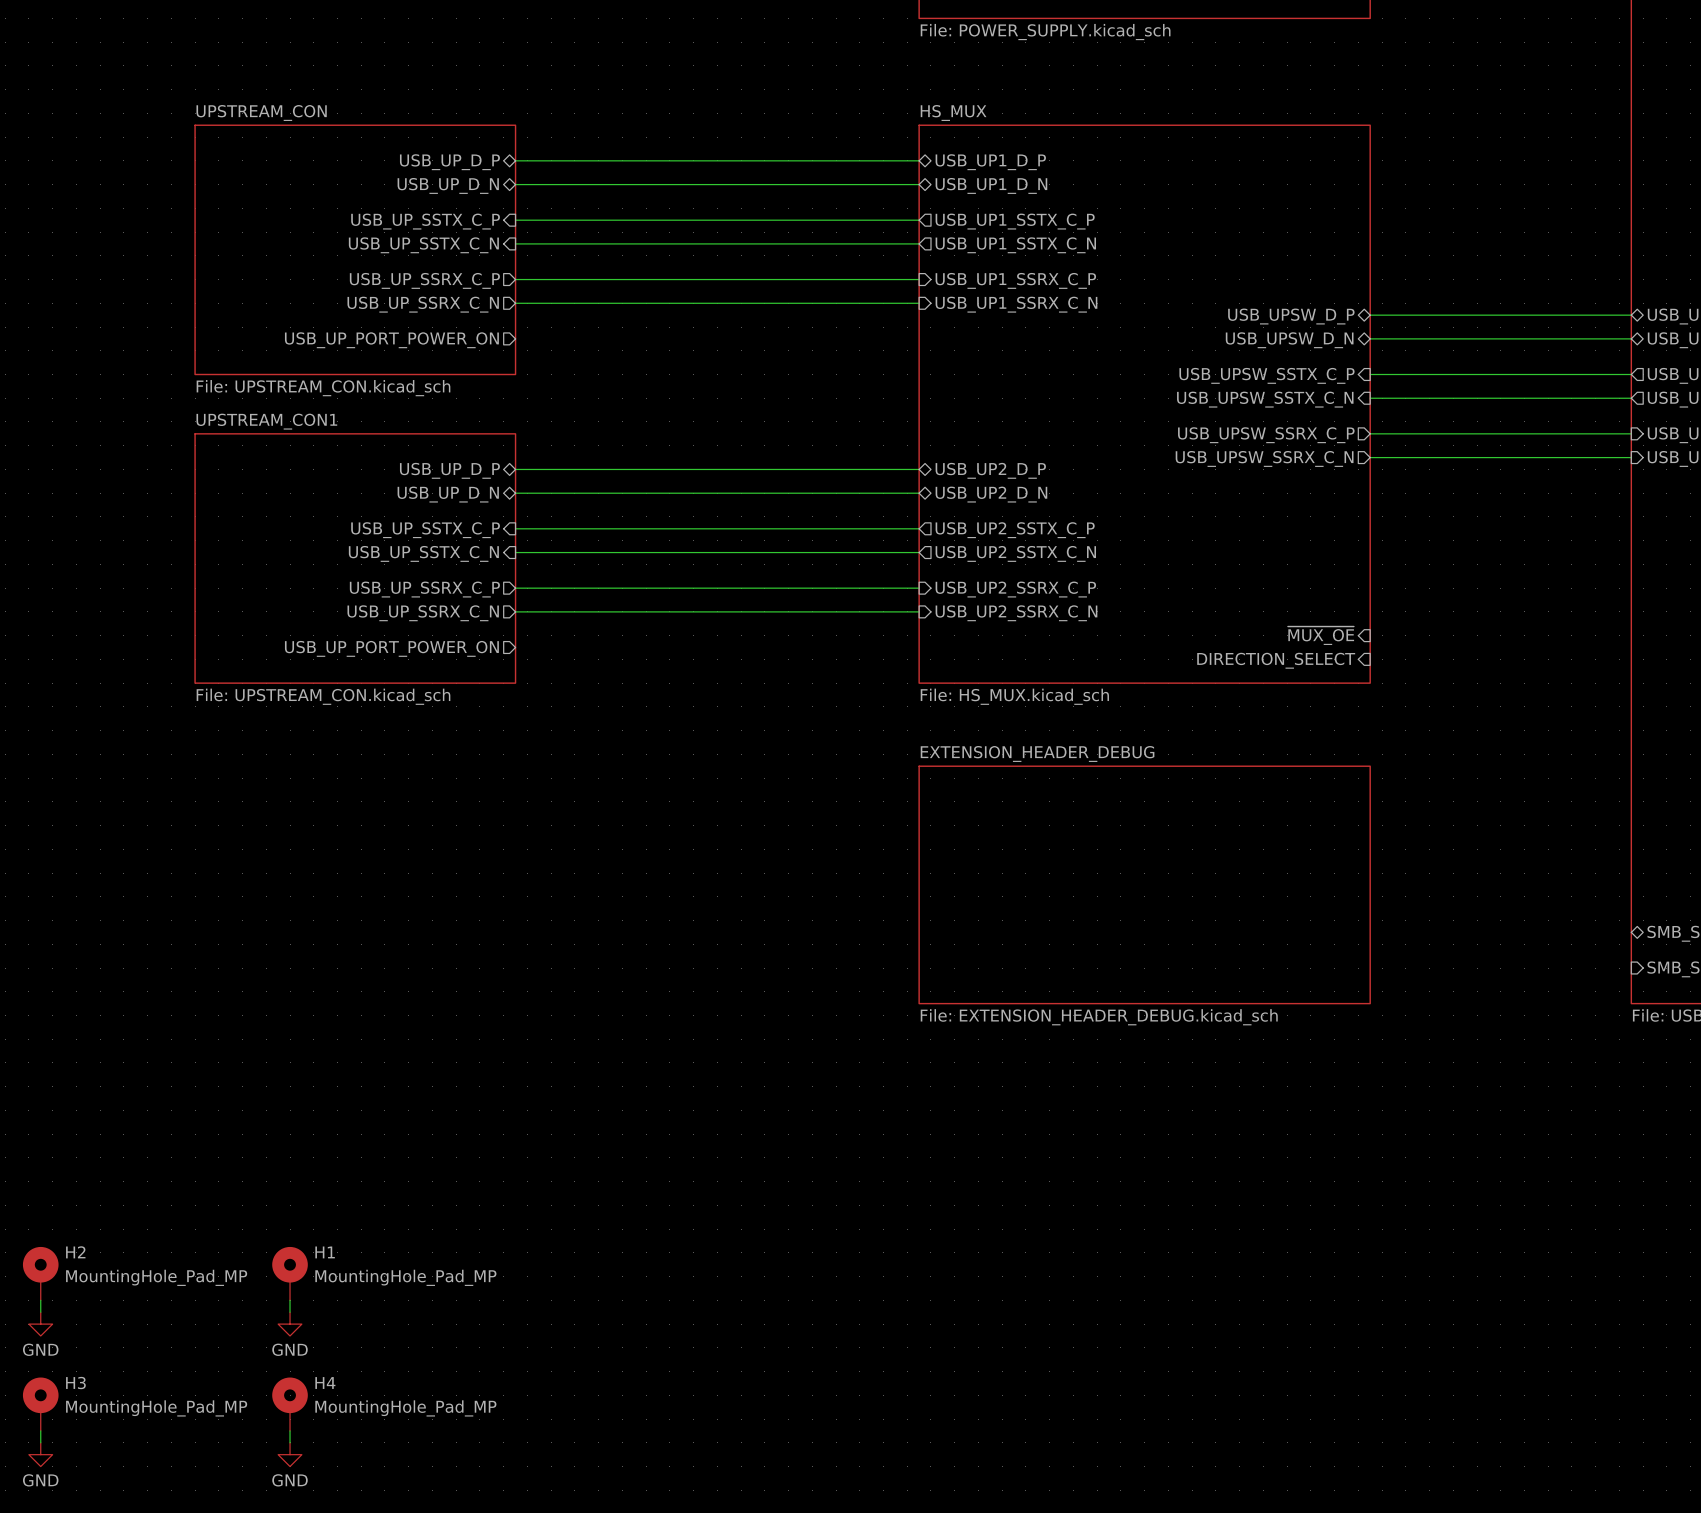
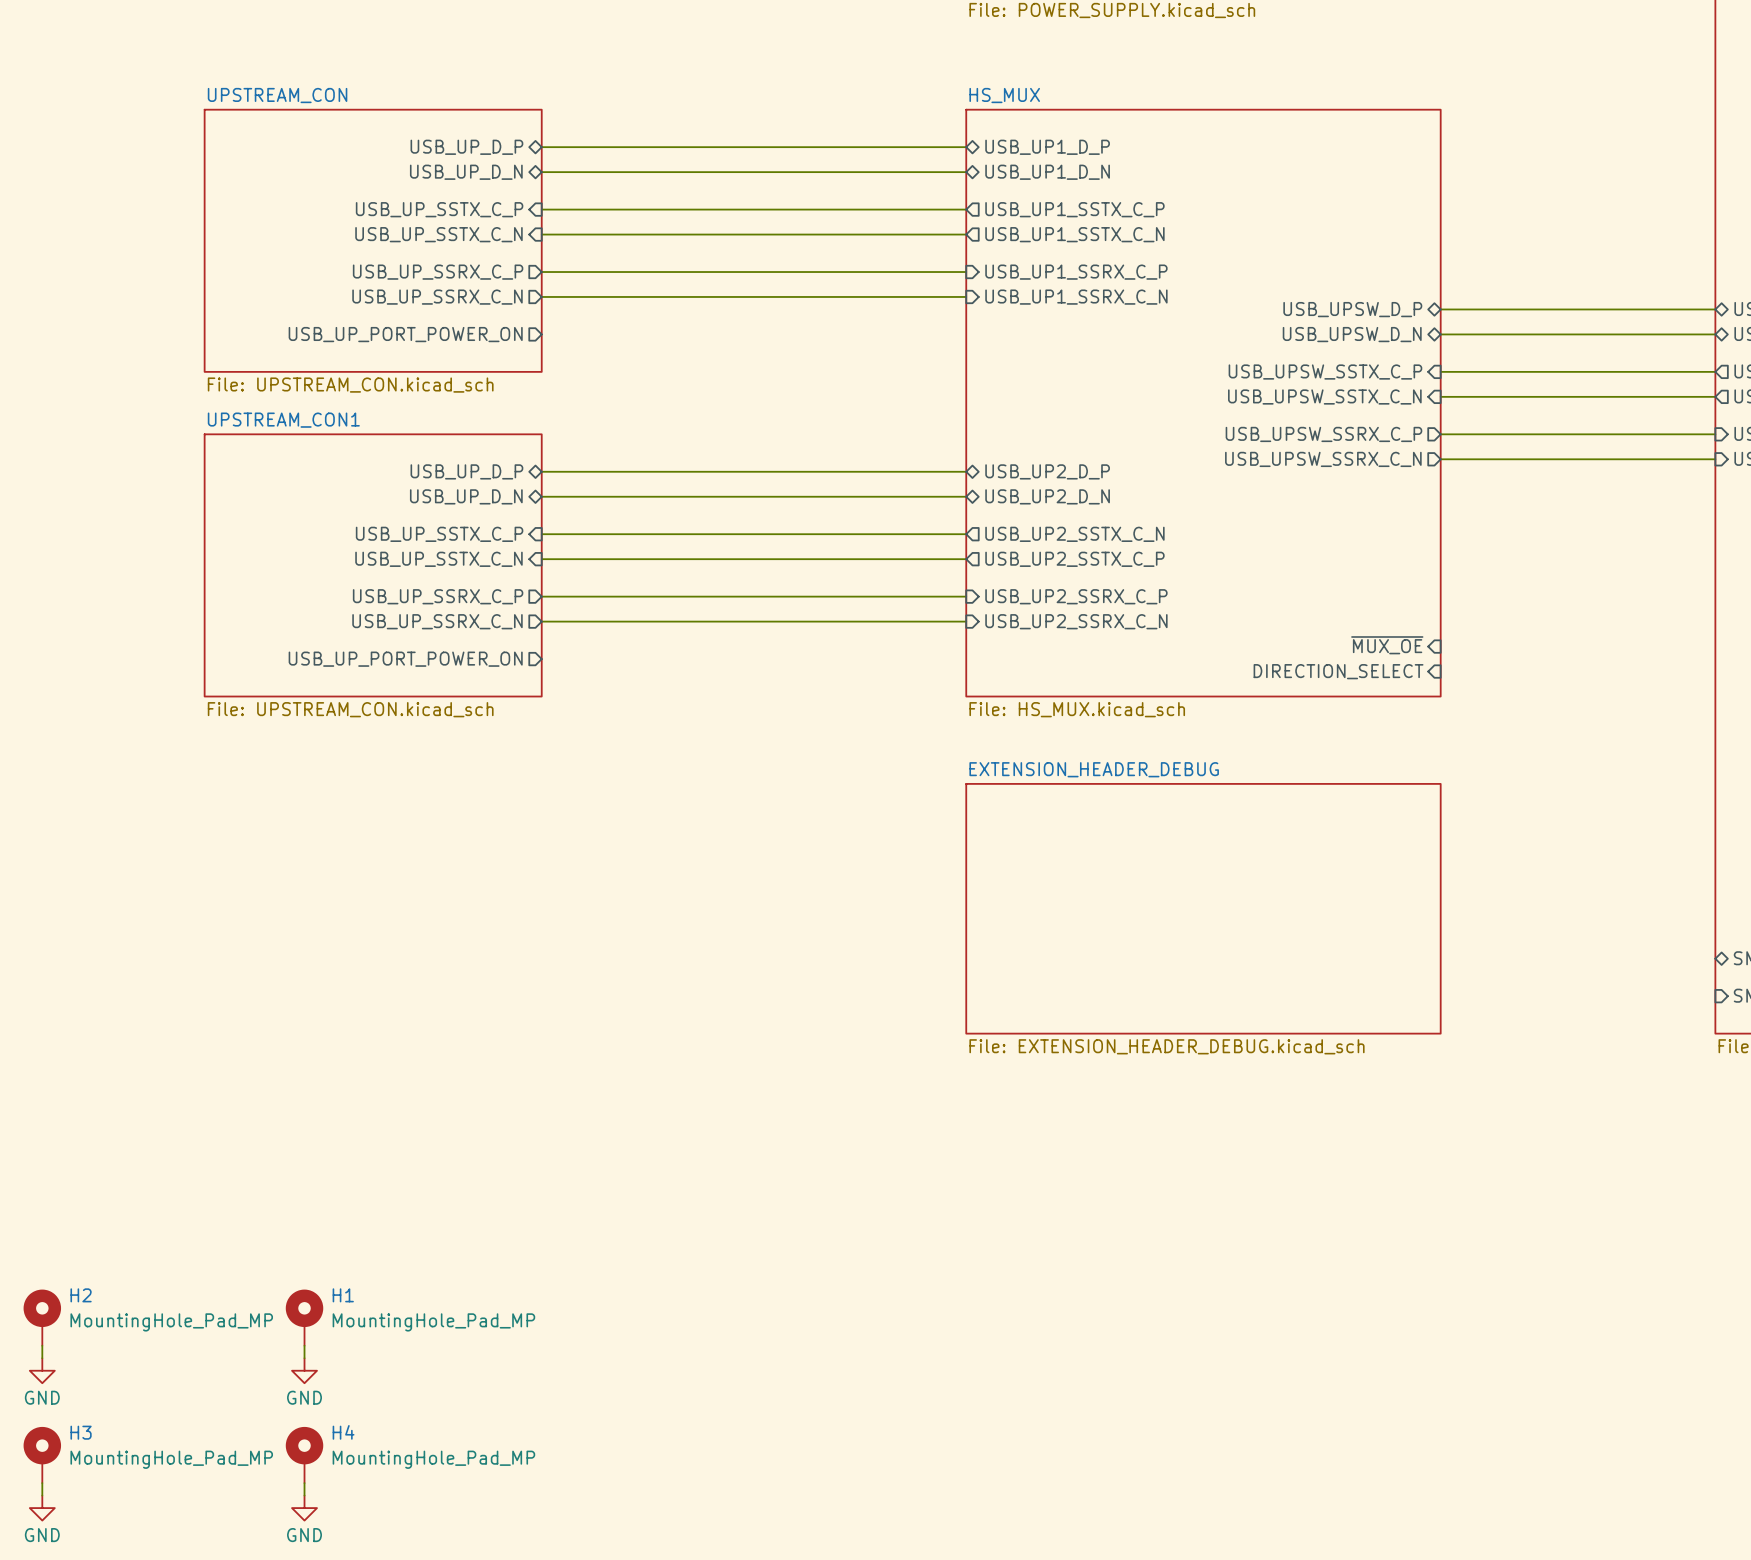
sheet pin: USB_UP2_SSTX_C_P (1015, 530) -> USB_UP2_SSTX_C_N (1074, 534)
sheet pin: USB_UP2_SSTX_C_N (1015, 553) -> USB_UP2_SSTX_C_P (1074, 559)

